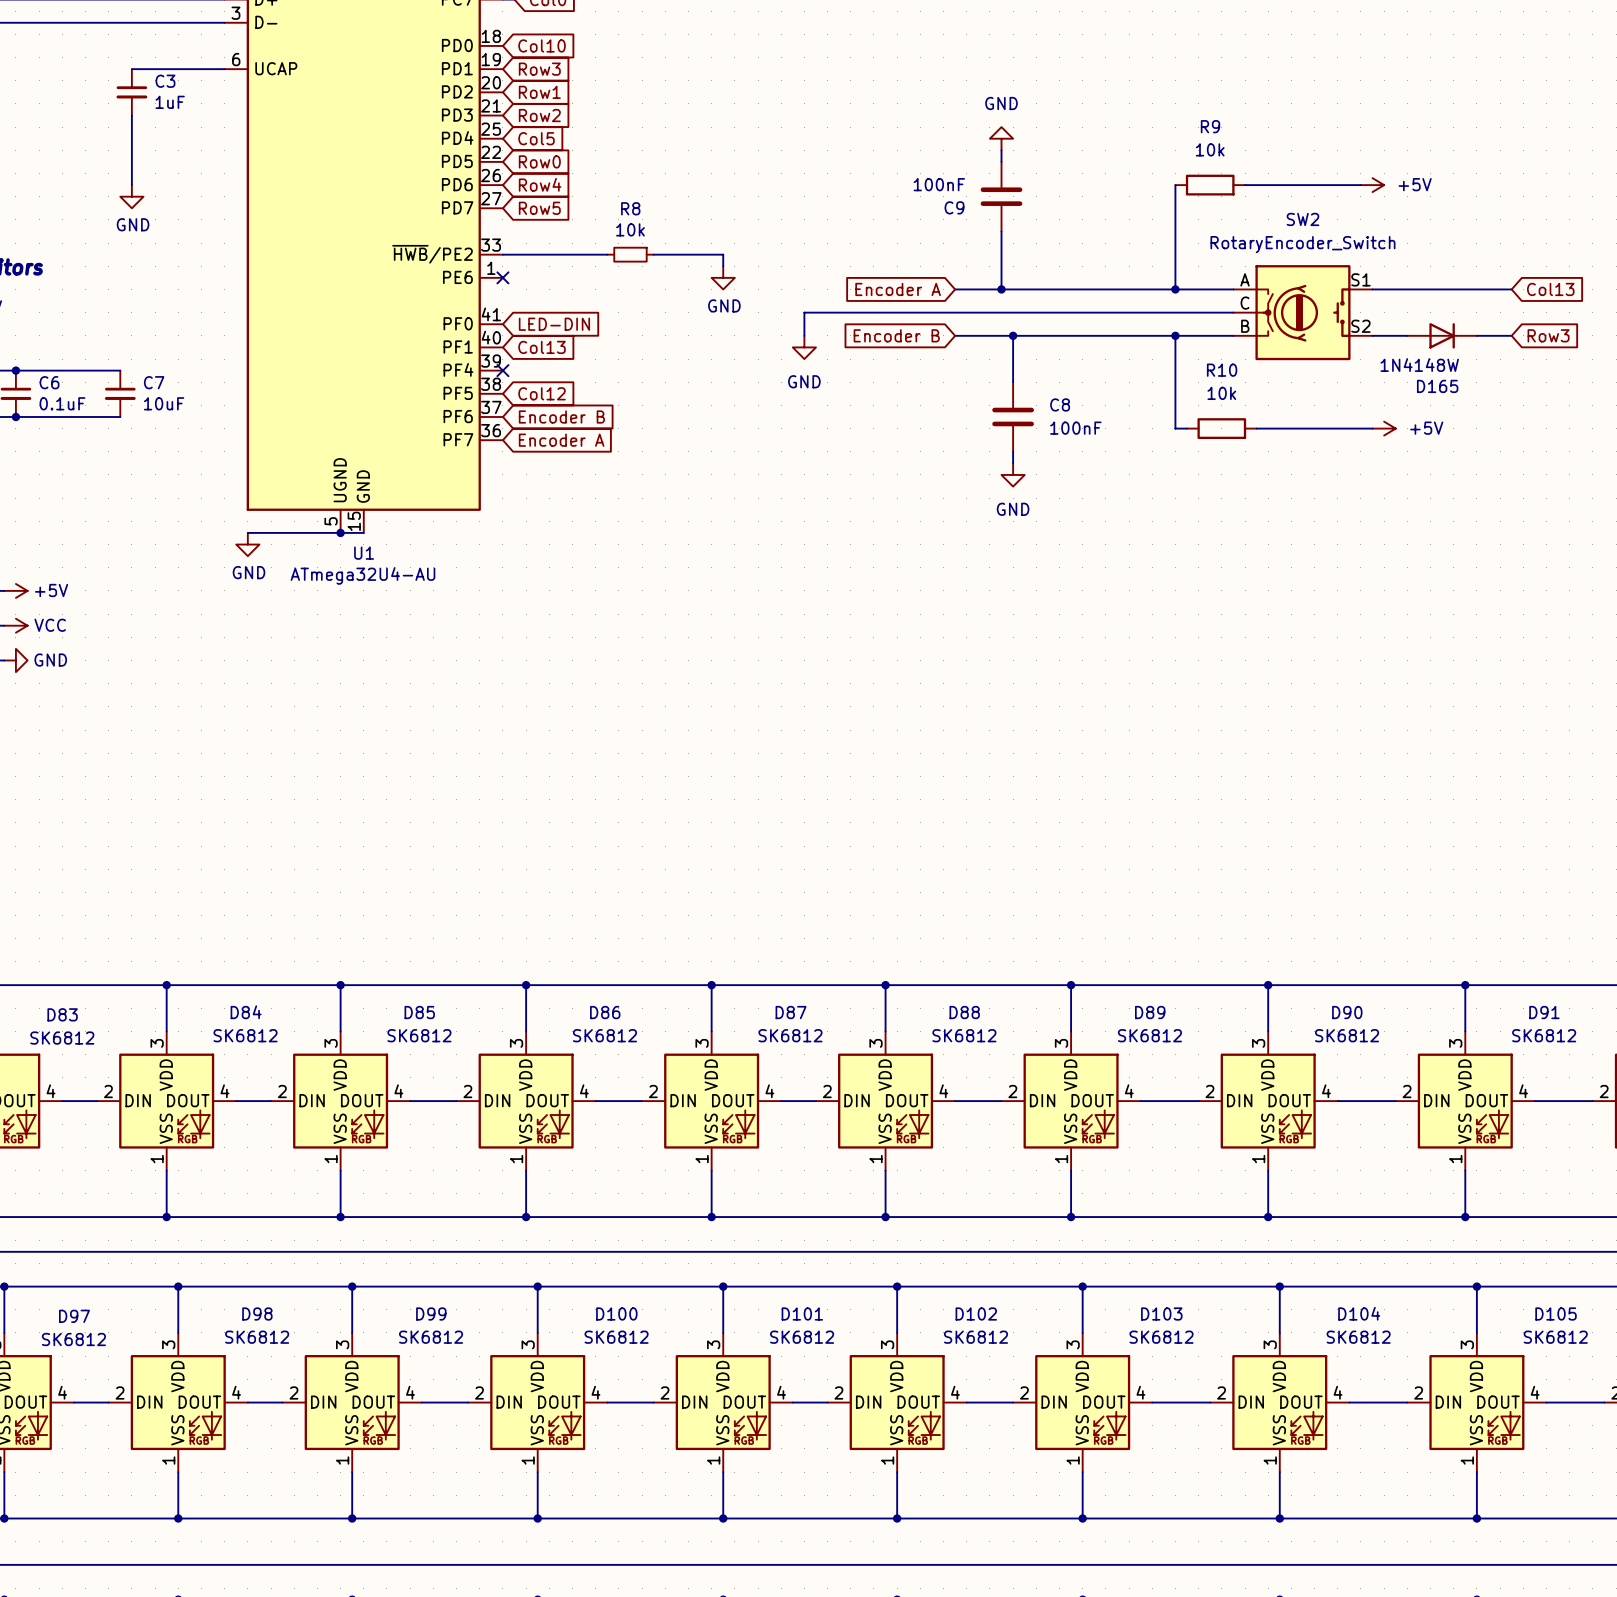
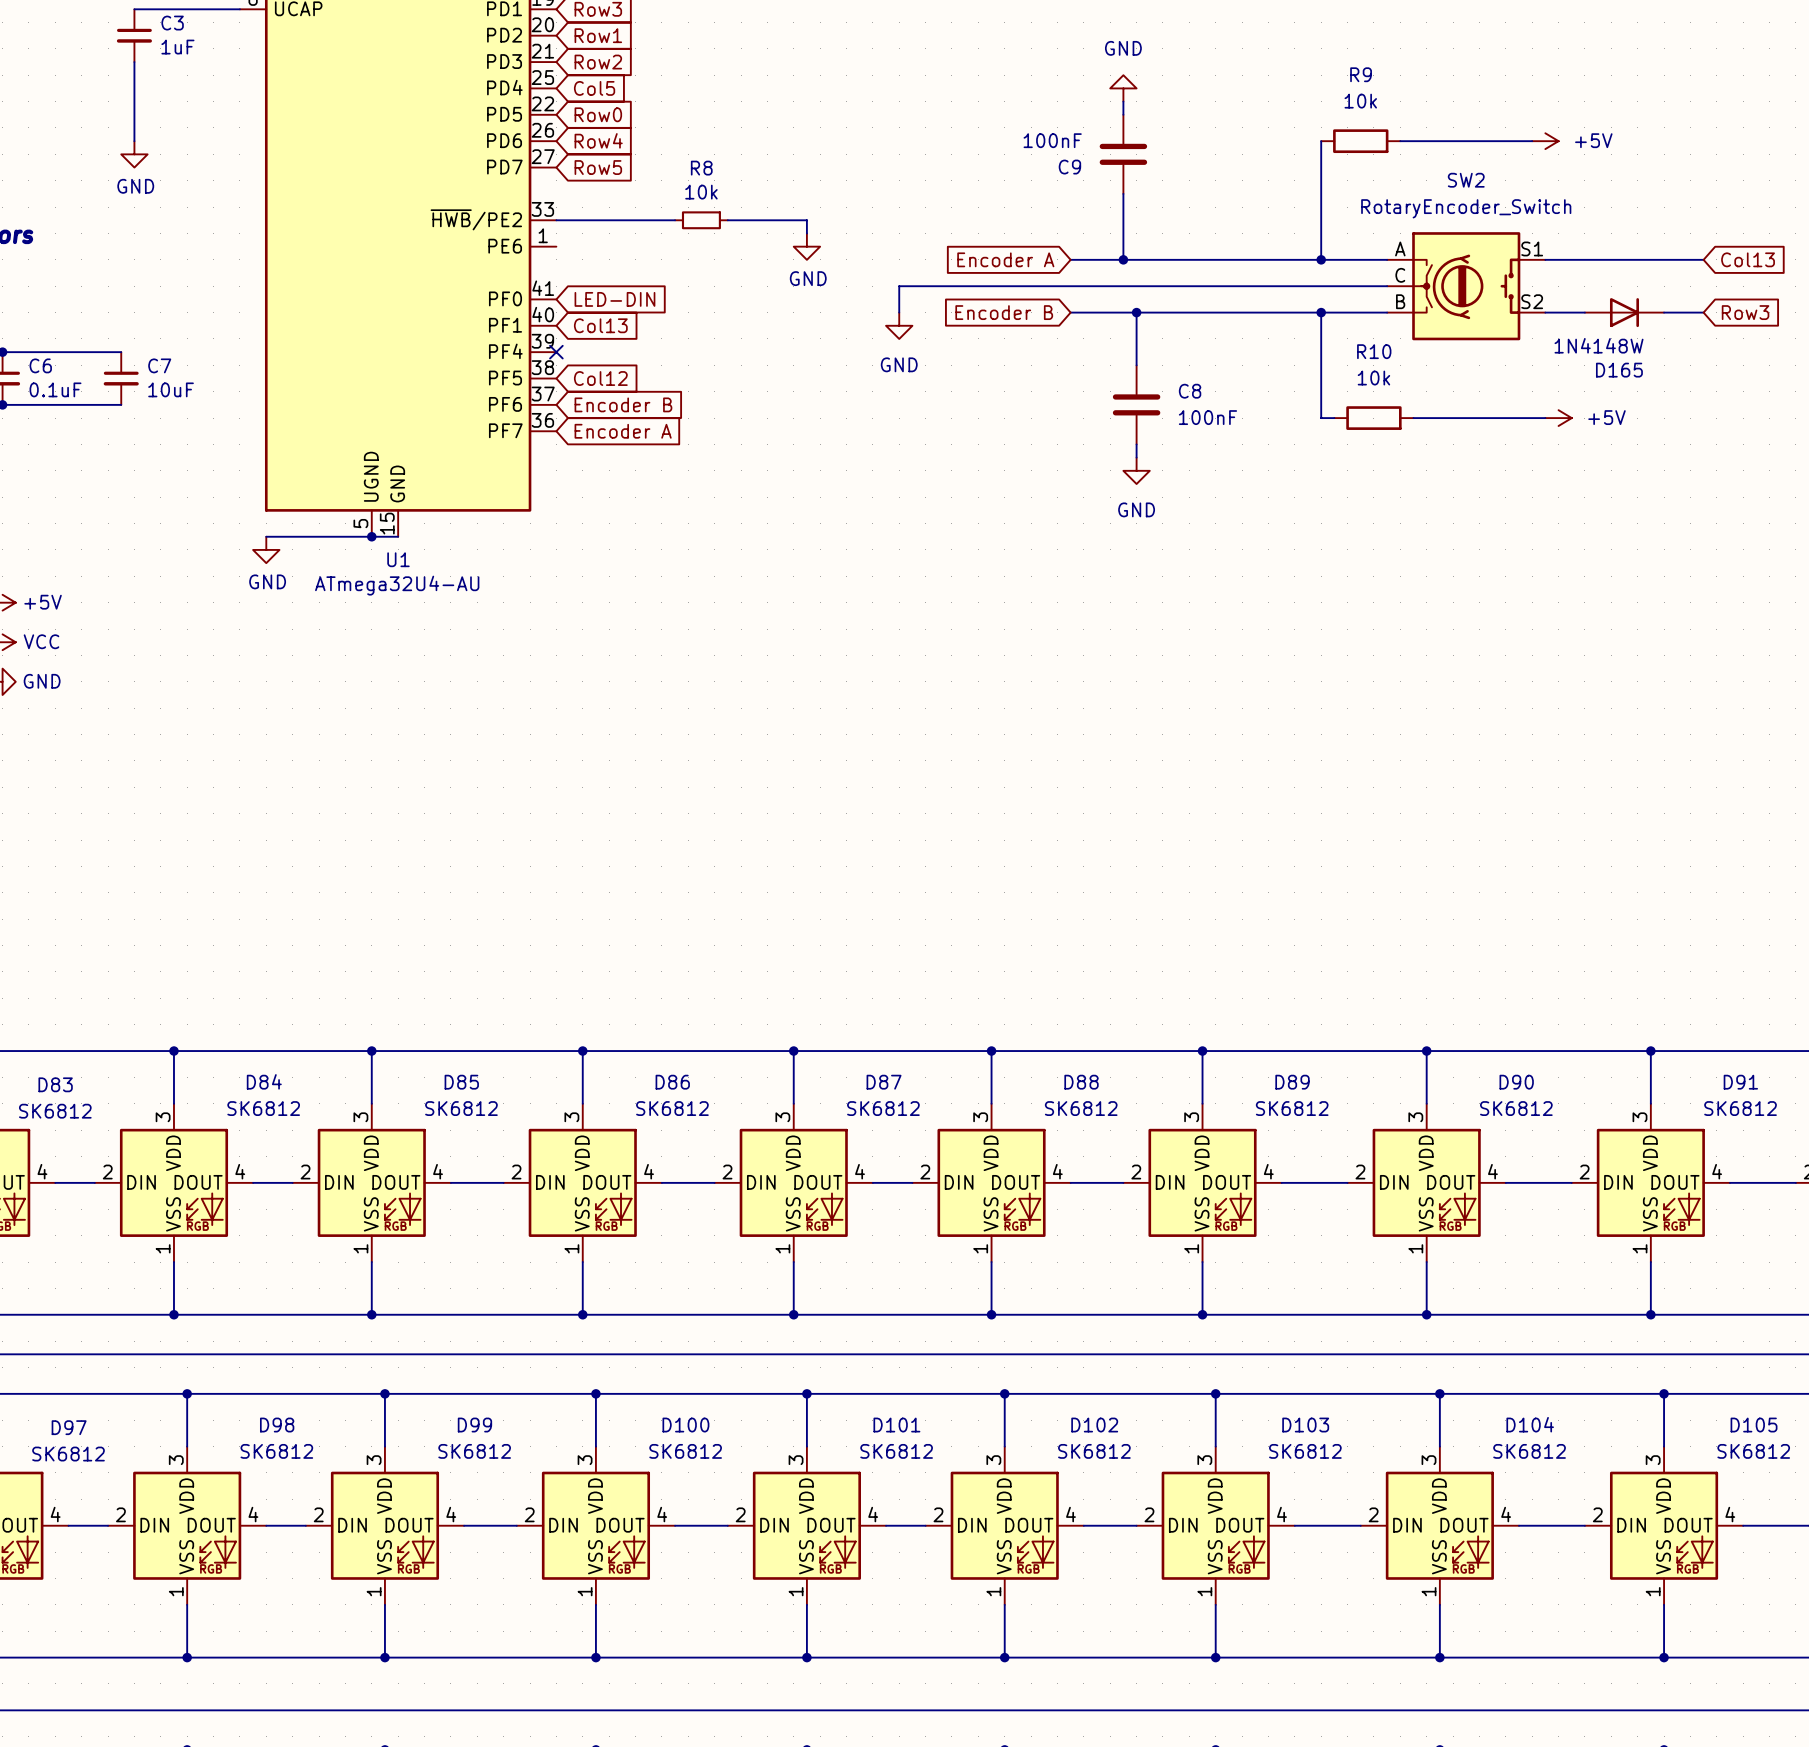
no-connect mark: (502, 277) -> none

